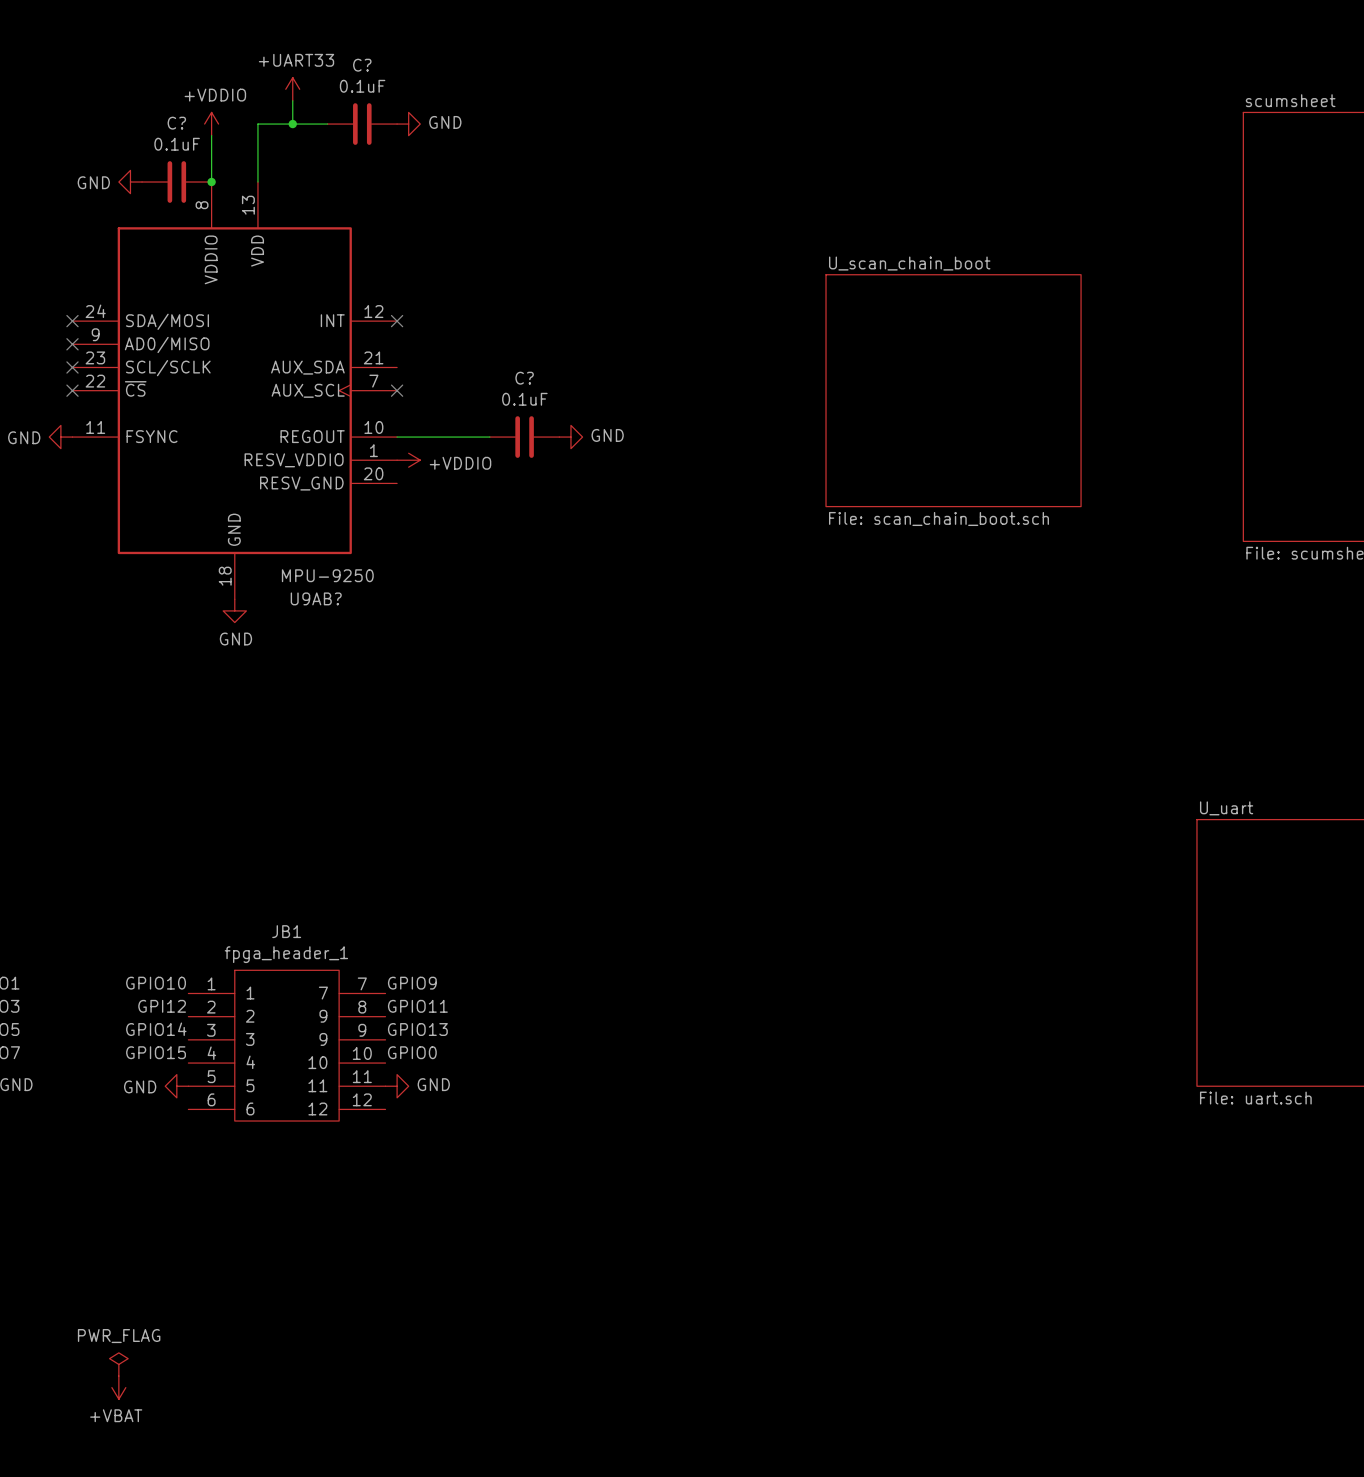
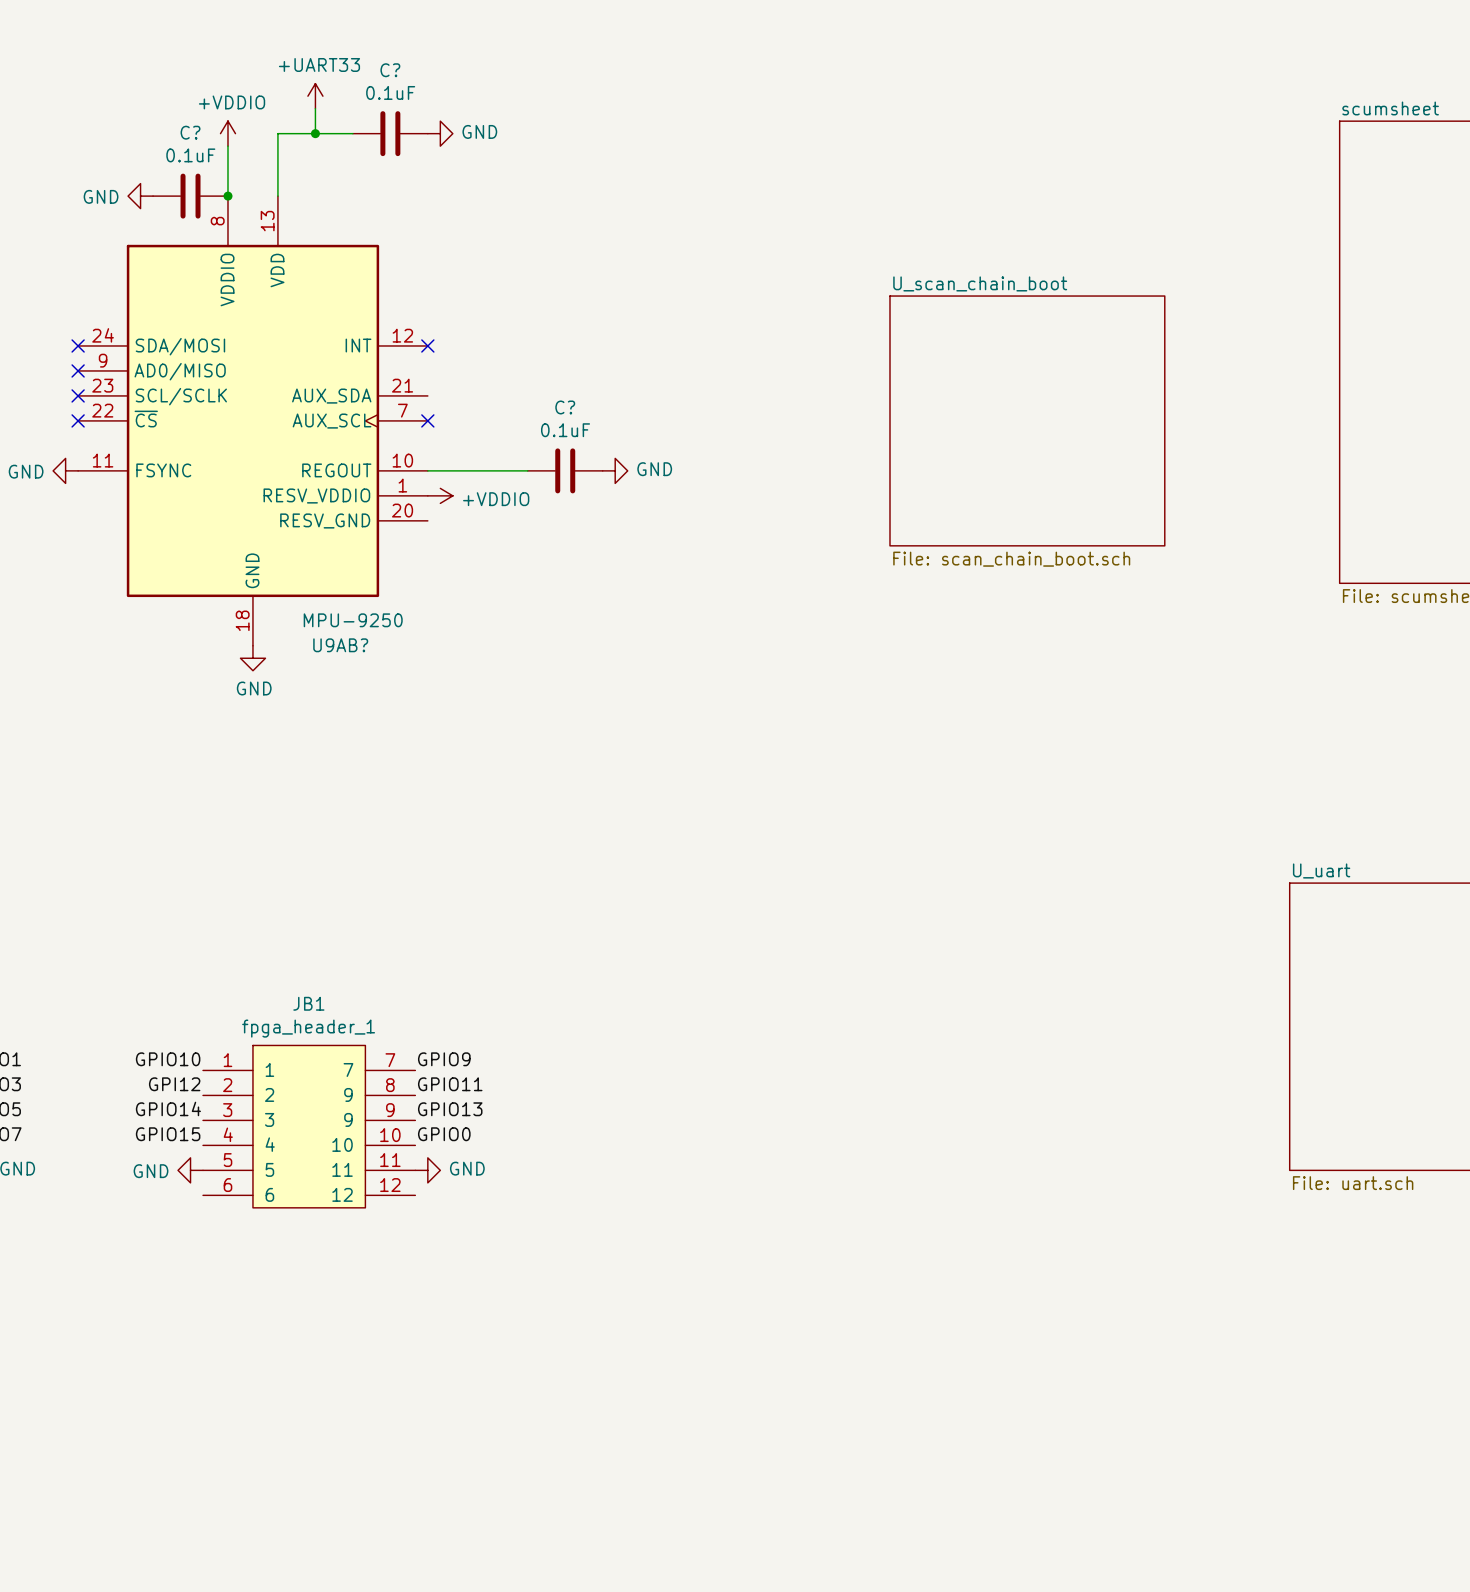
power symbol: PWR_FLAG (118, 1364) -> none
power symbol: +VBAT (118, 1387) -> none

